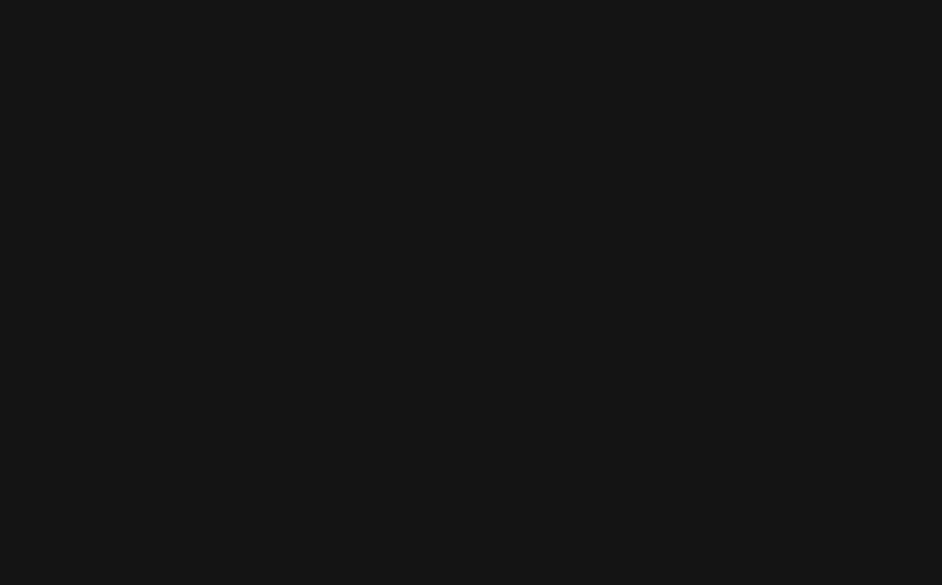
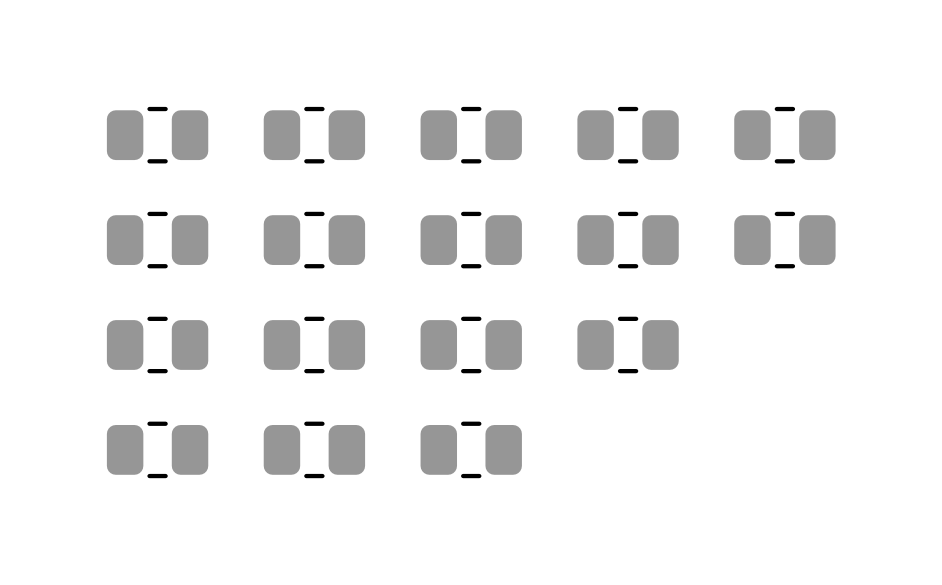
part: none -> (157, 135)
part: none -> (314, 135)
part: none -> (471, 135)
part: none -> (628, 135)
part: none -> (784, 135)
part: none -> (157, 240)
part: none -> (314, 240)
part: none -> (471, 240)
part: none -> (628, 240)
part: none -> (784, 240)
part: none -> (157, 344)
part: none -> (314, 344)
part: none -> (471, 344)
part: none -> (628, 344)
part: none -> (157, 449)
part: none -> (314, 449)
part: none -> (471, 449)

